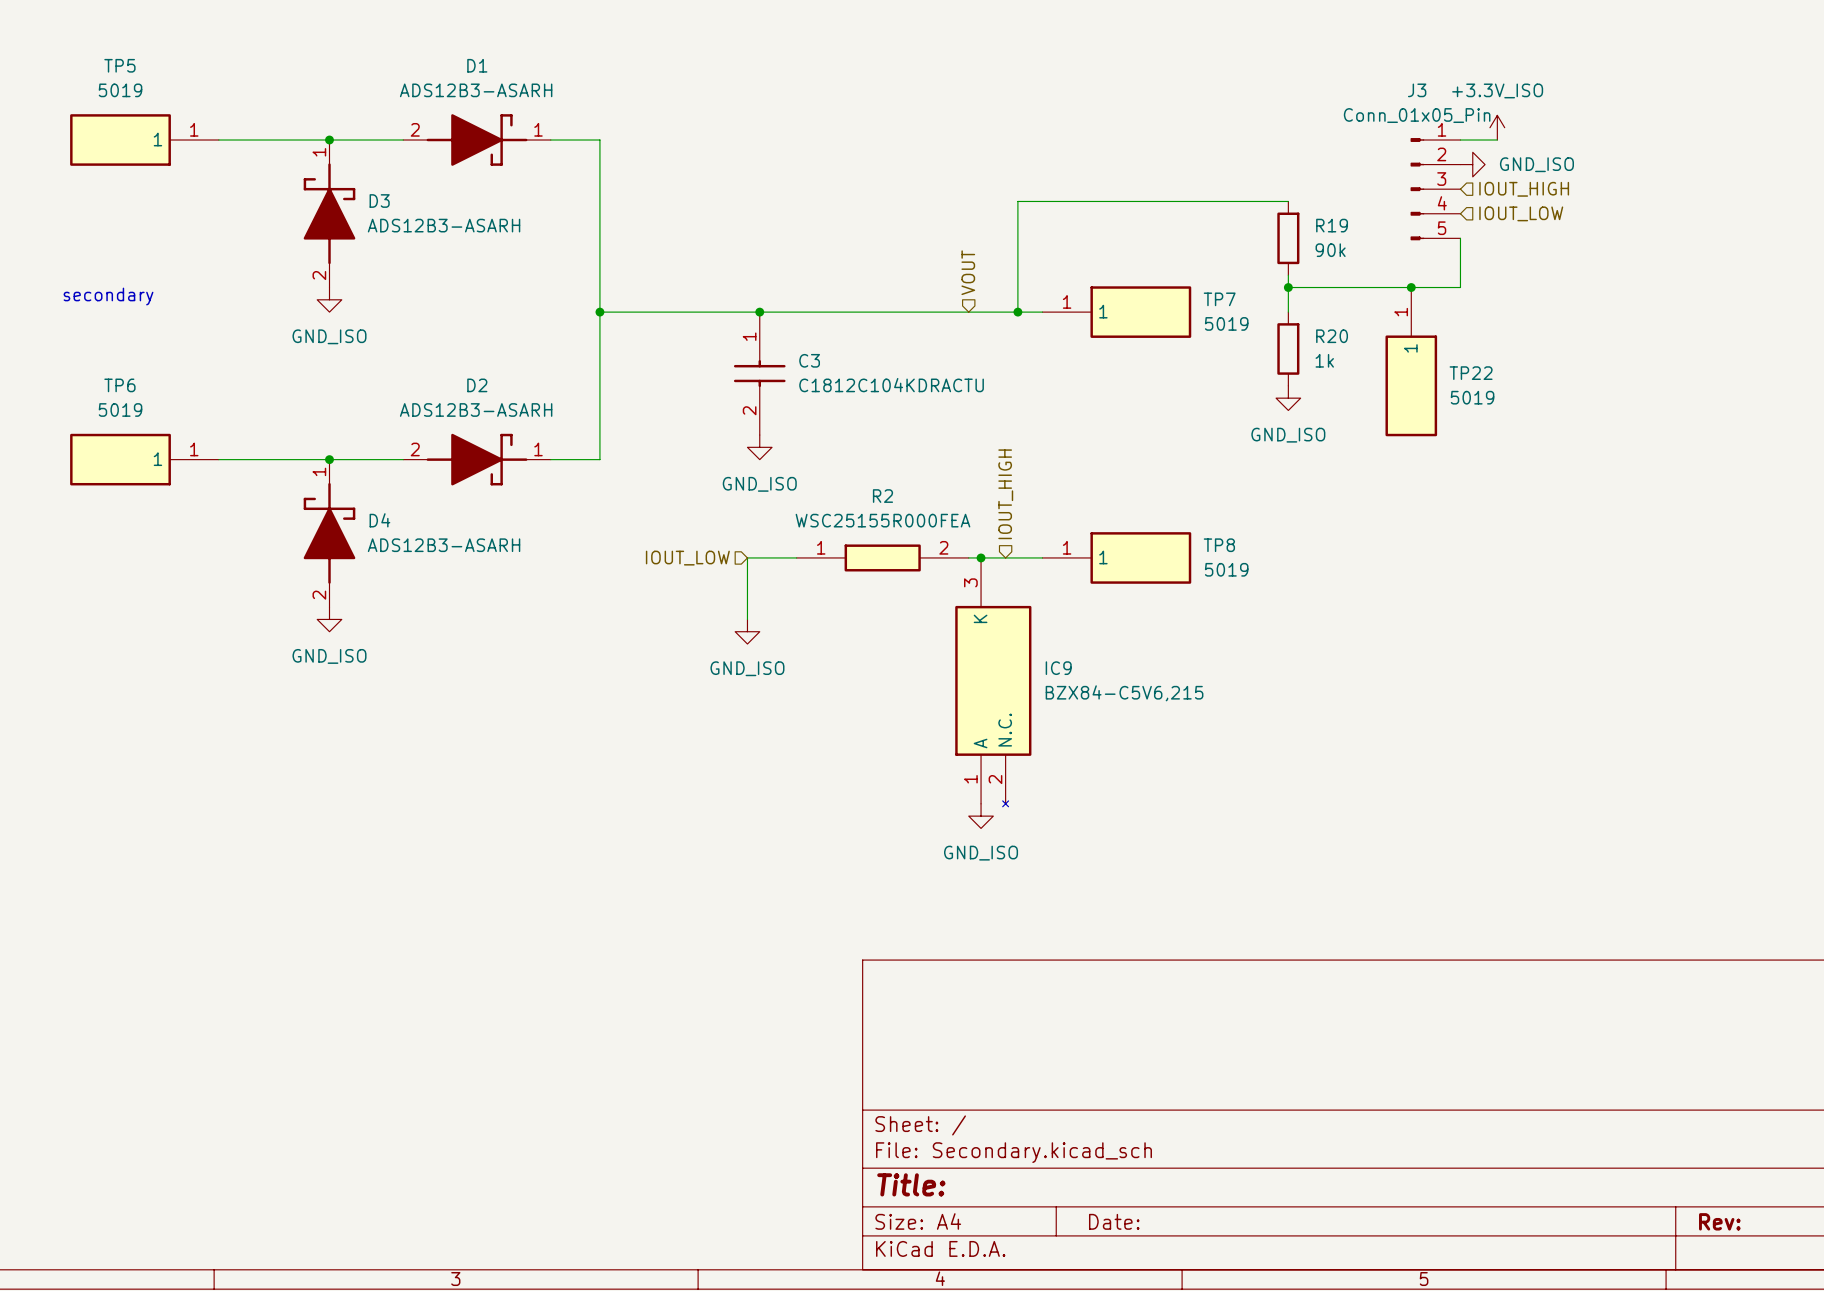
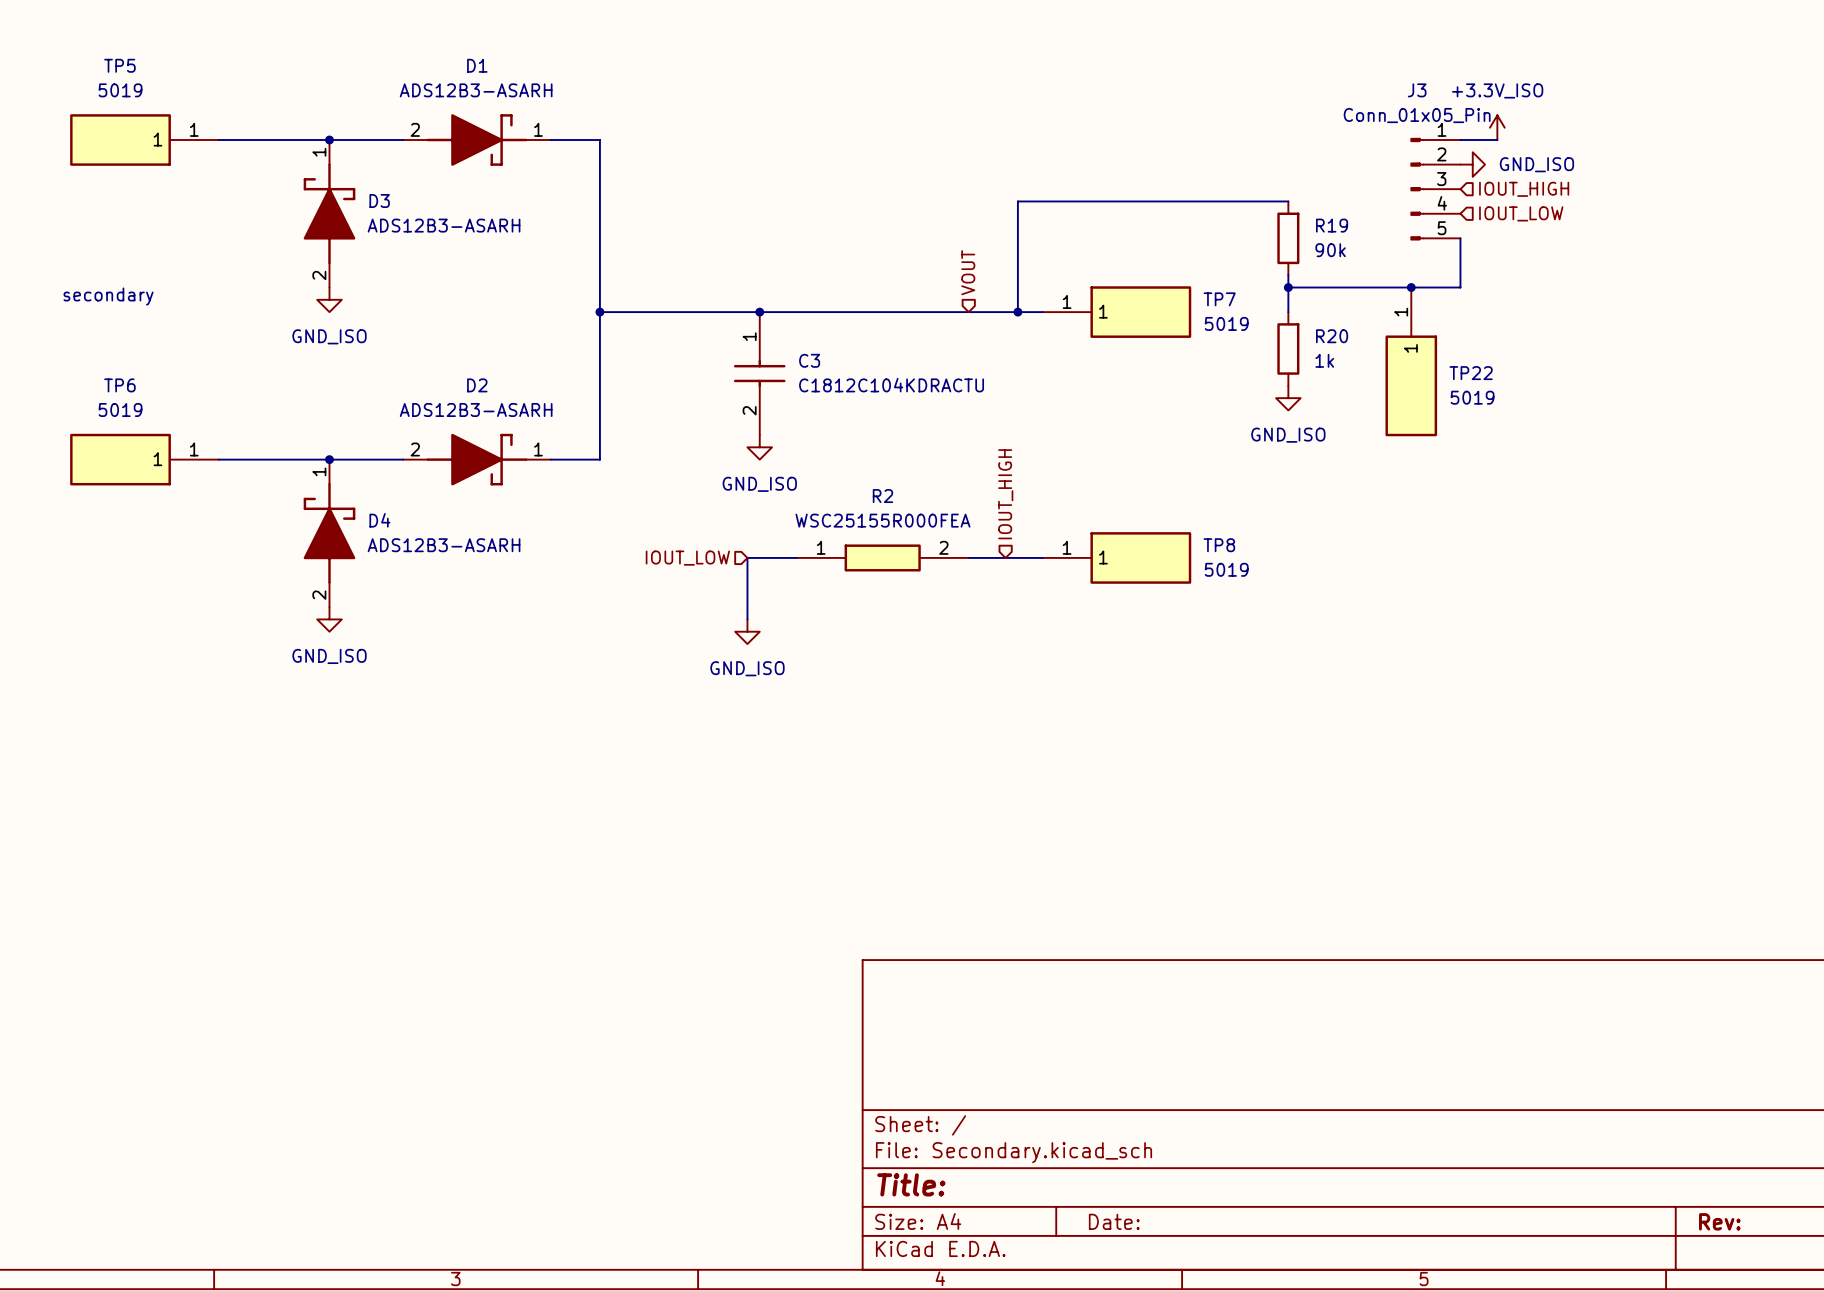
junction: (981, 557) -> none
IC9: BZX84-C5V6,215 (993, 682) -> none
power symbol: GND_ISO (981, 816) -> none

